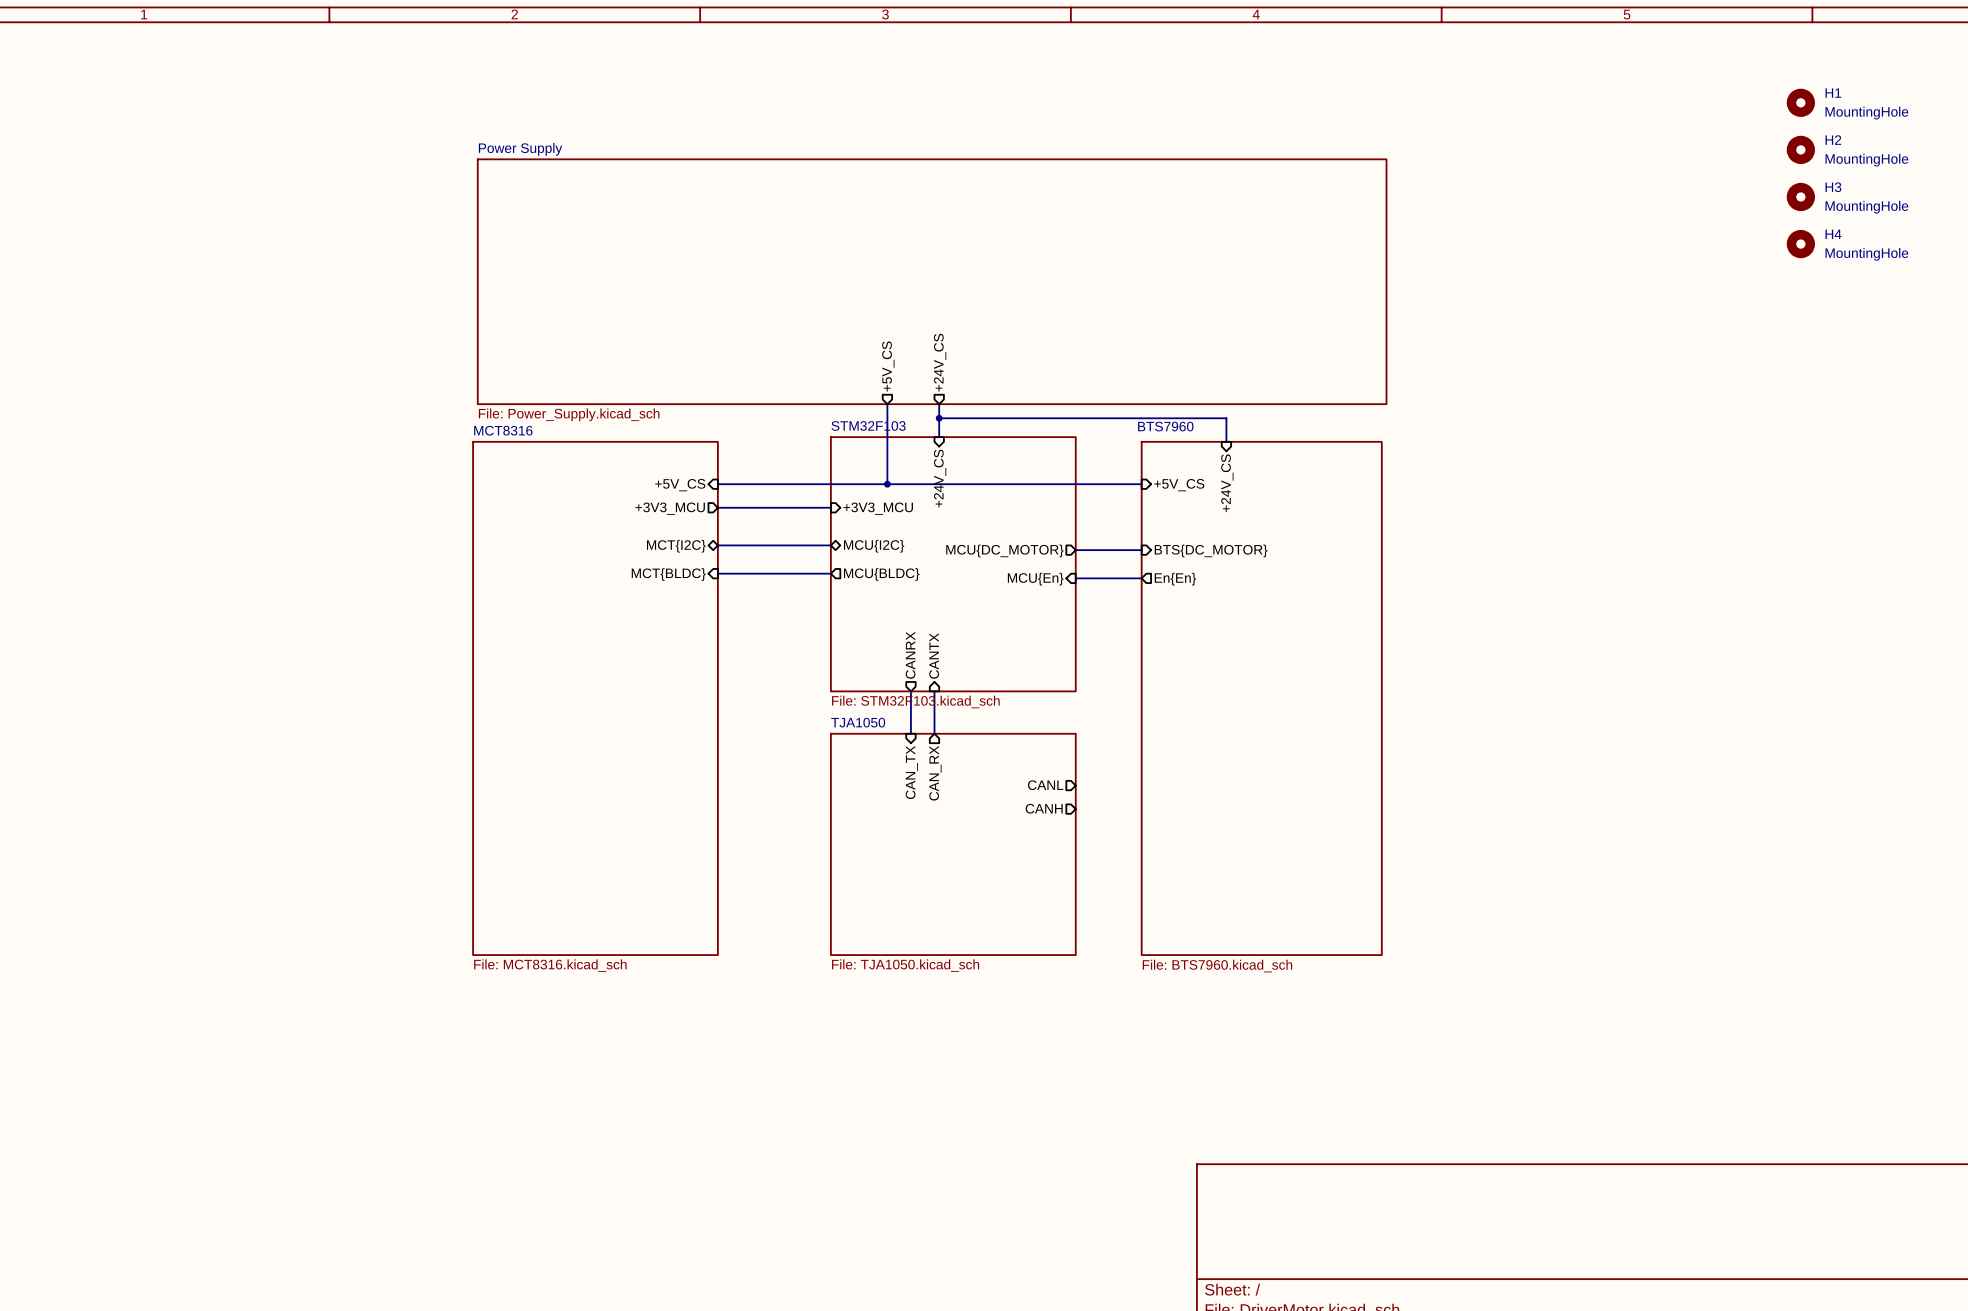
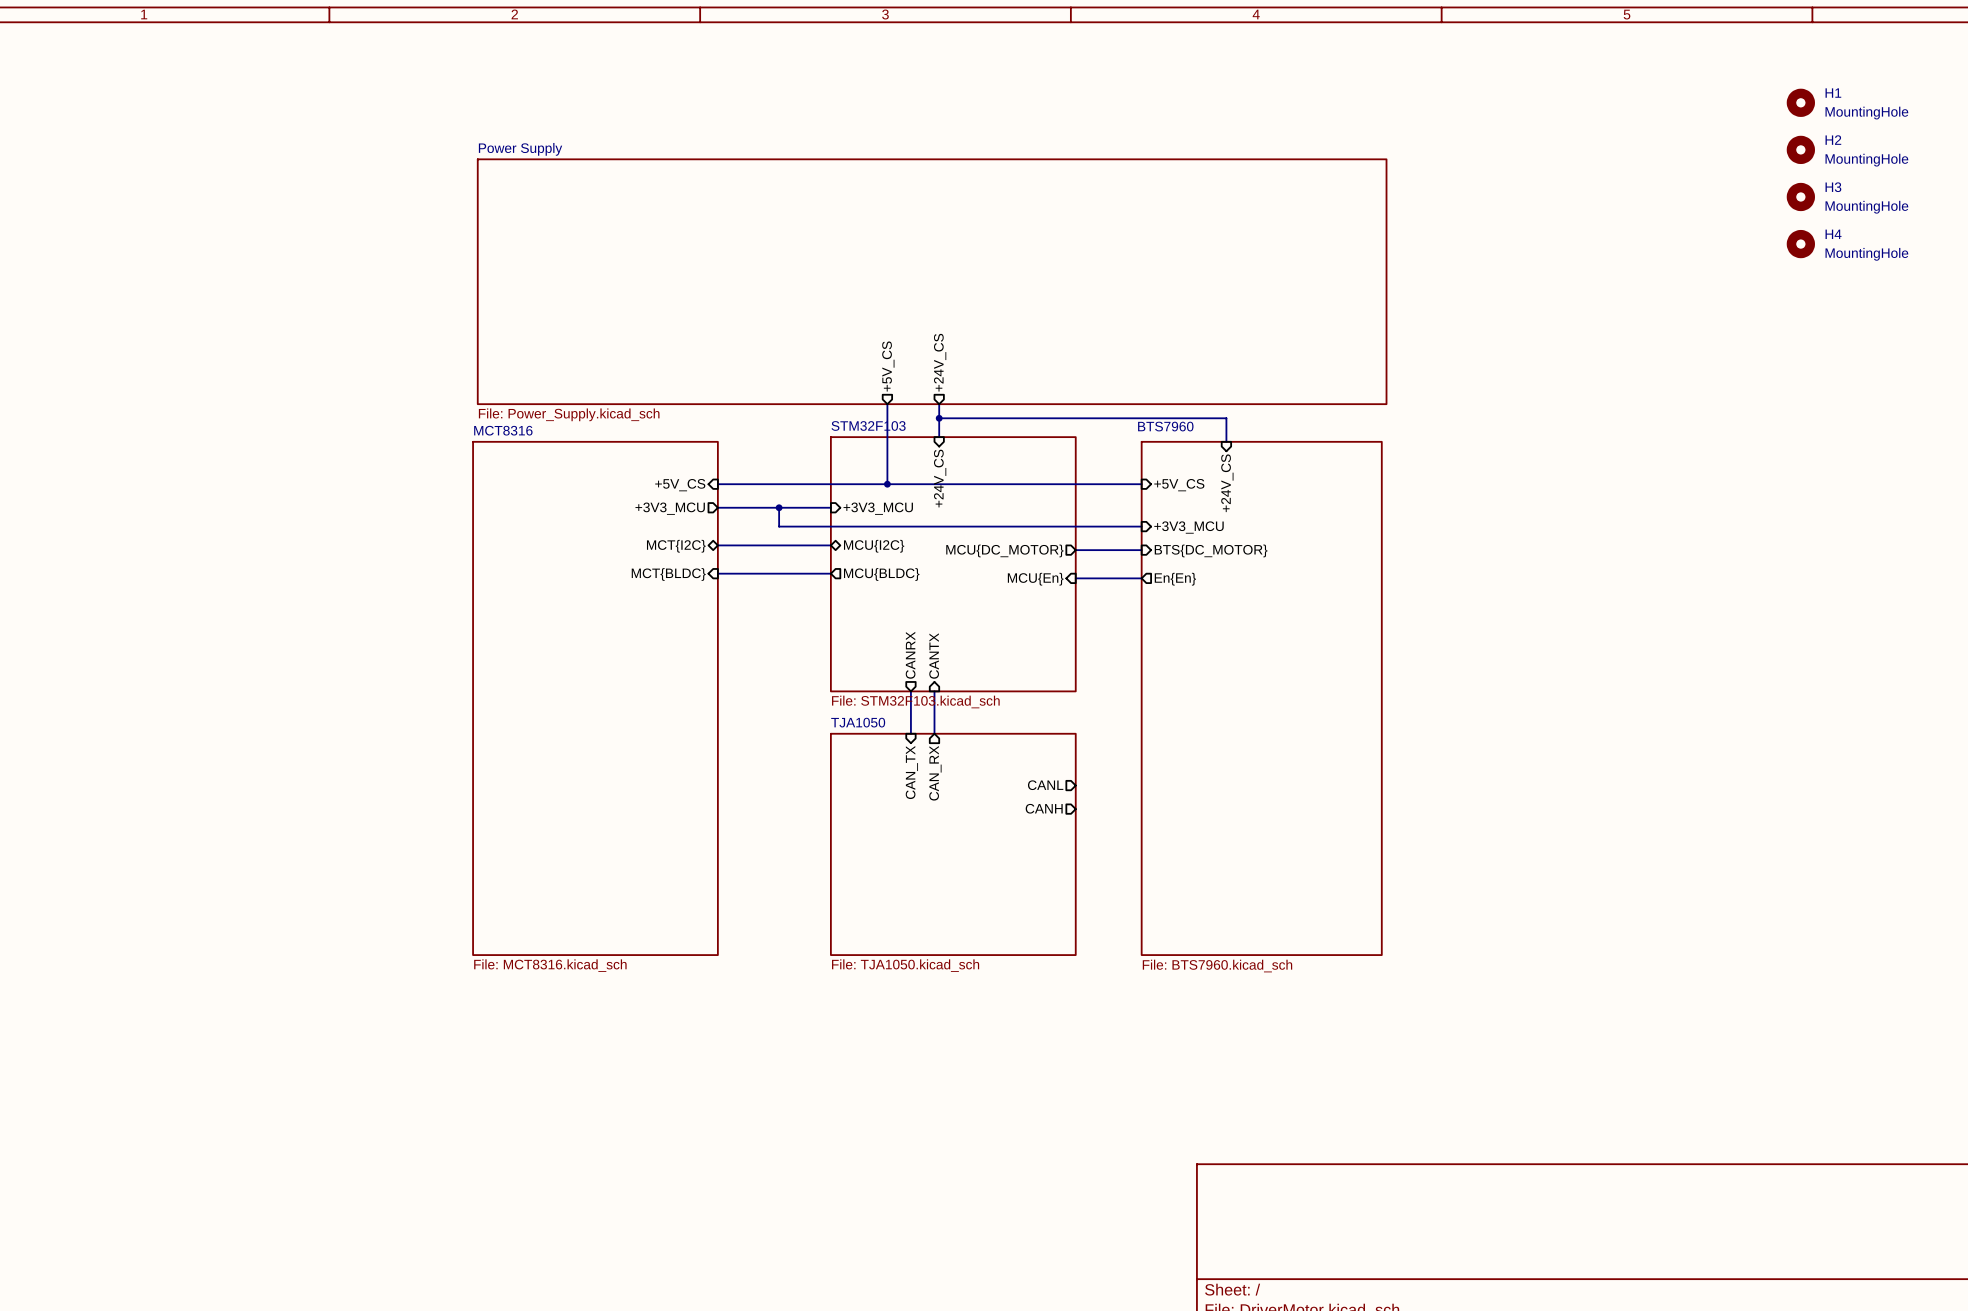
wire: none -> (779, 507) (779, 526) (1141, 526)
junction: none -> (779, 507)
sheet pin: none -> +3V3_MCU (1189, 527)

